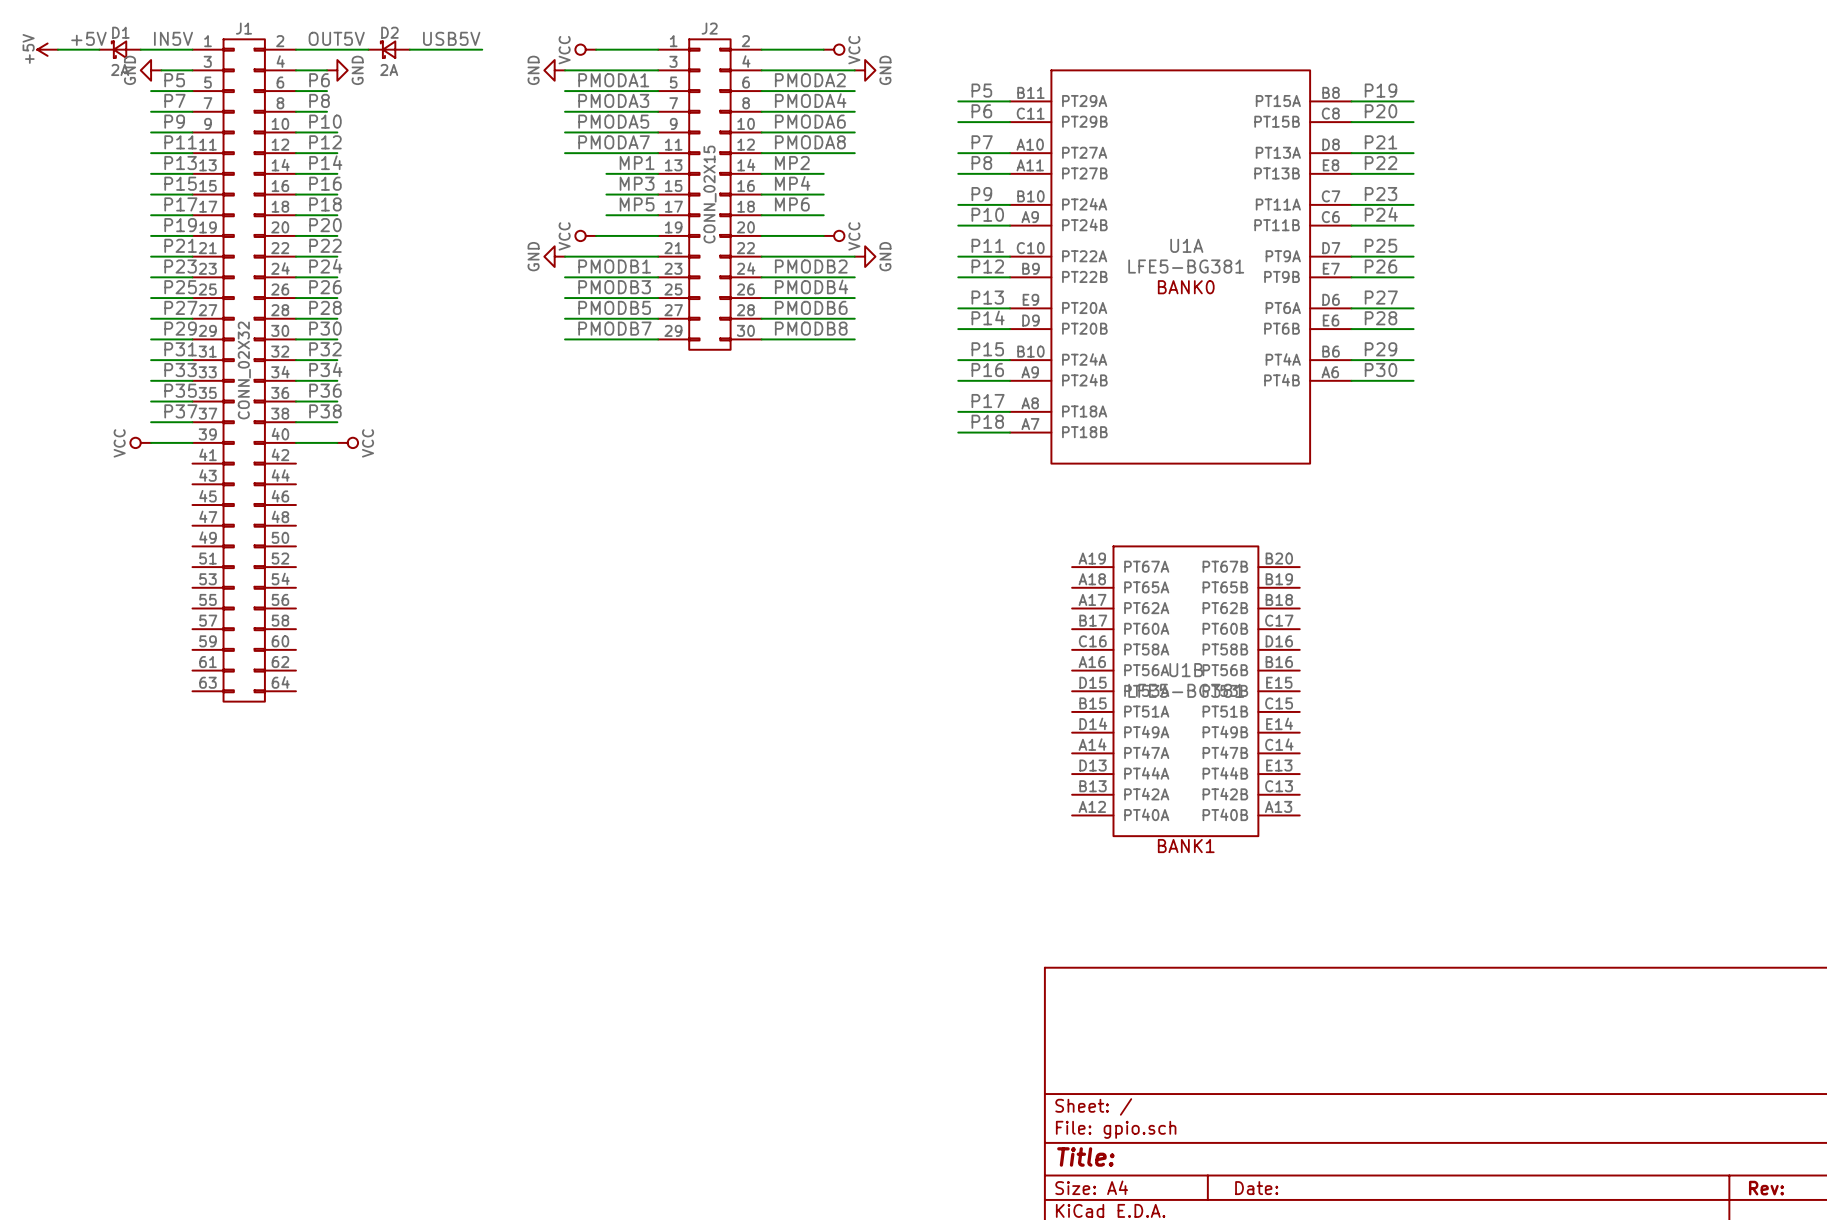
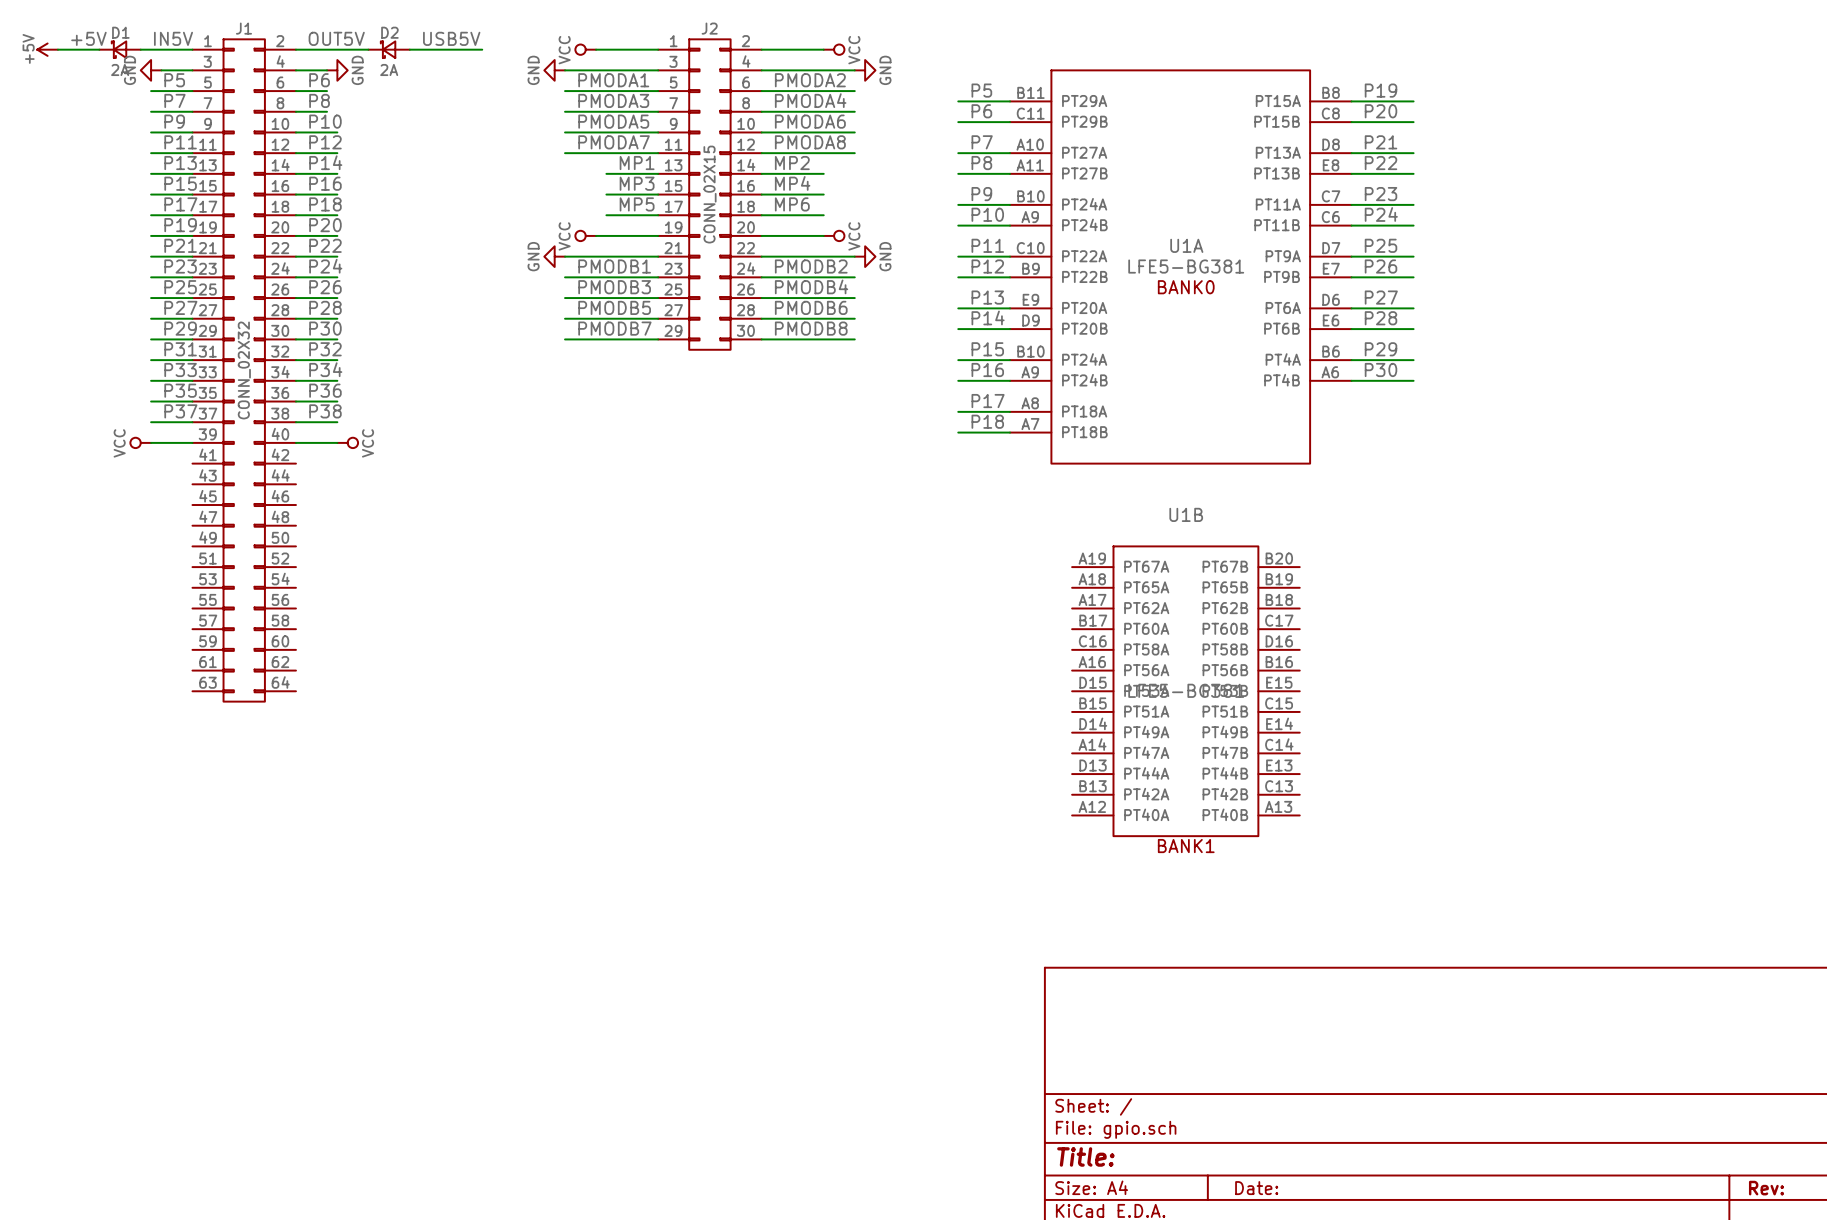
U1B name position: U1B (1186, 670) -> U1B (1186, 514)

